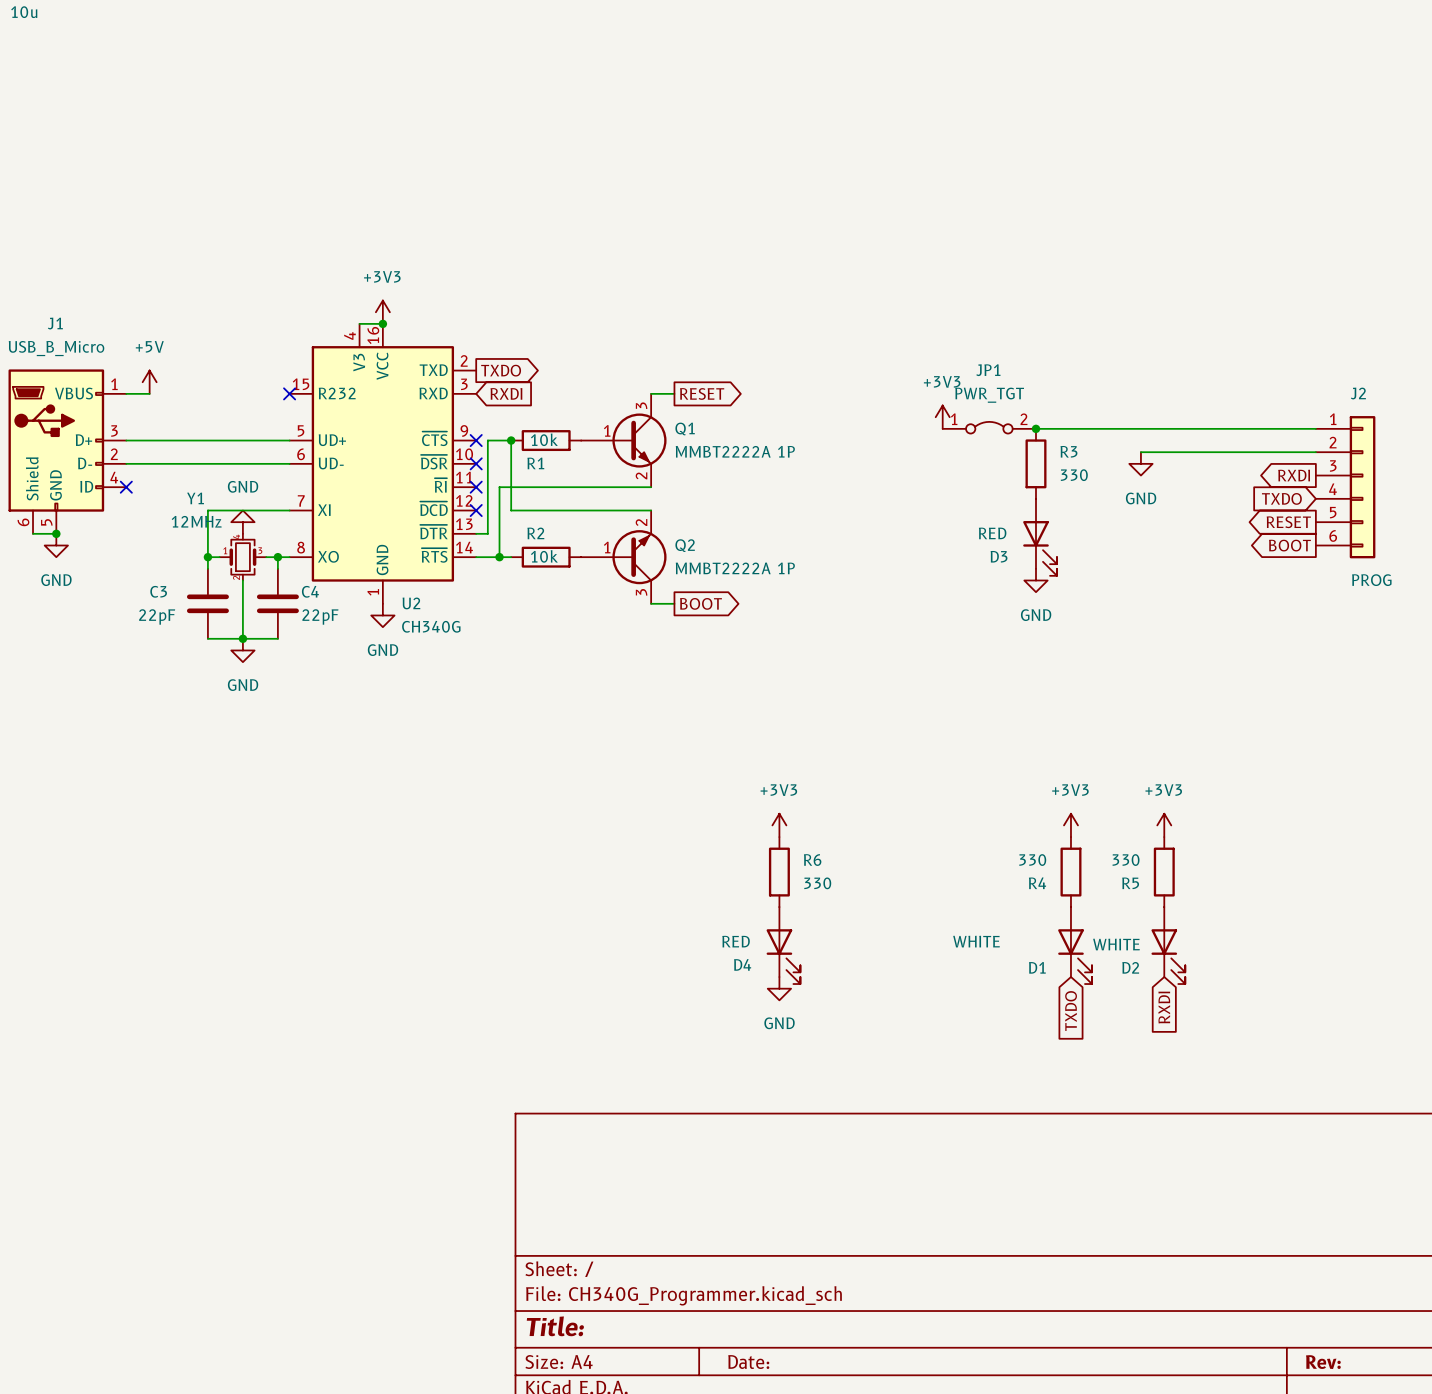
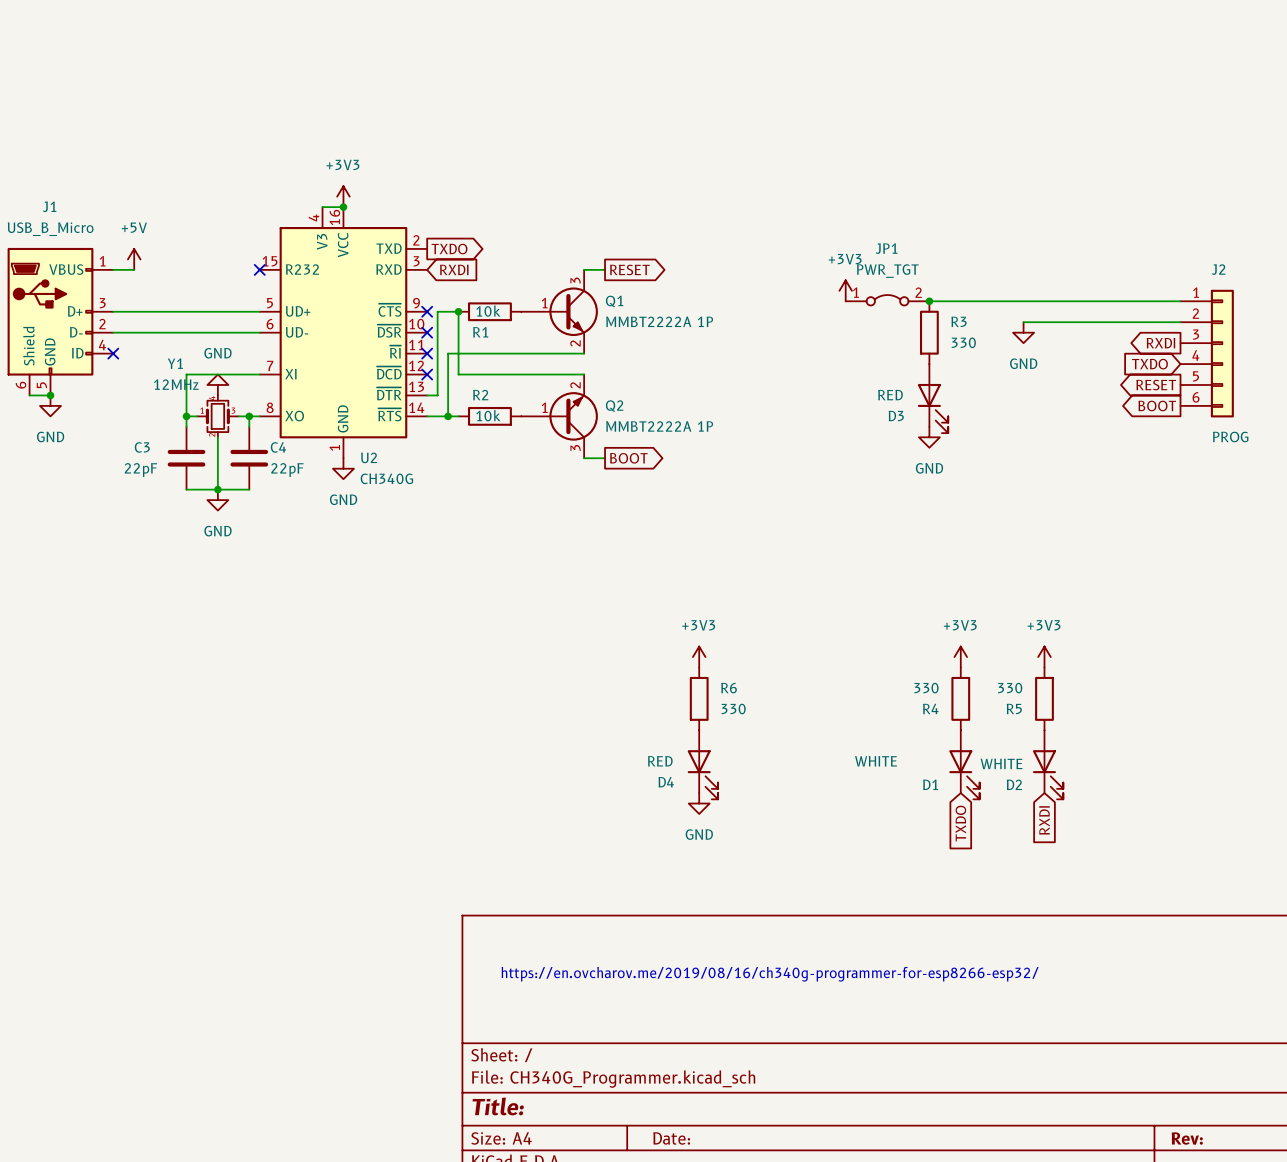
text: none -> https://en.ovcharov.me/2019/08/16/ch340g-programmer-for-esp8266-esp32/ (770, 974)

